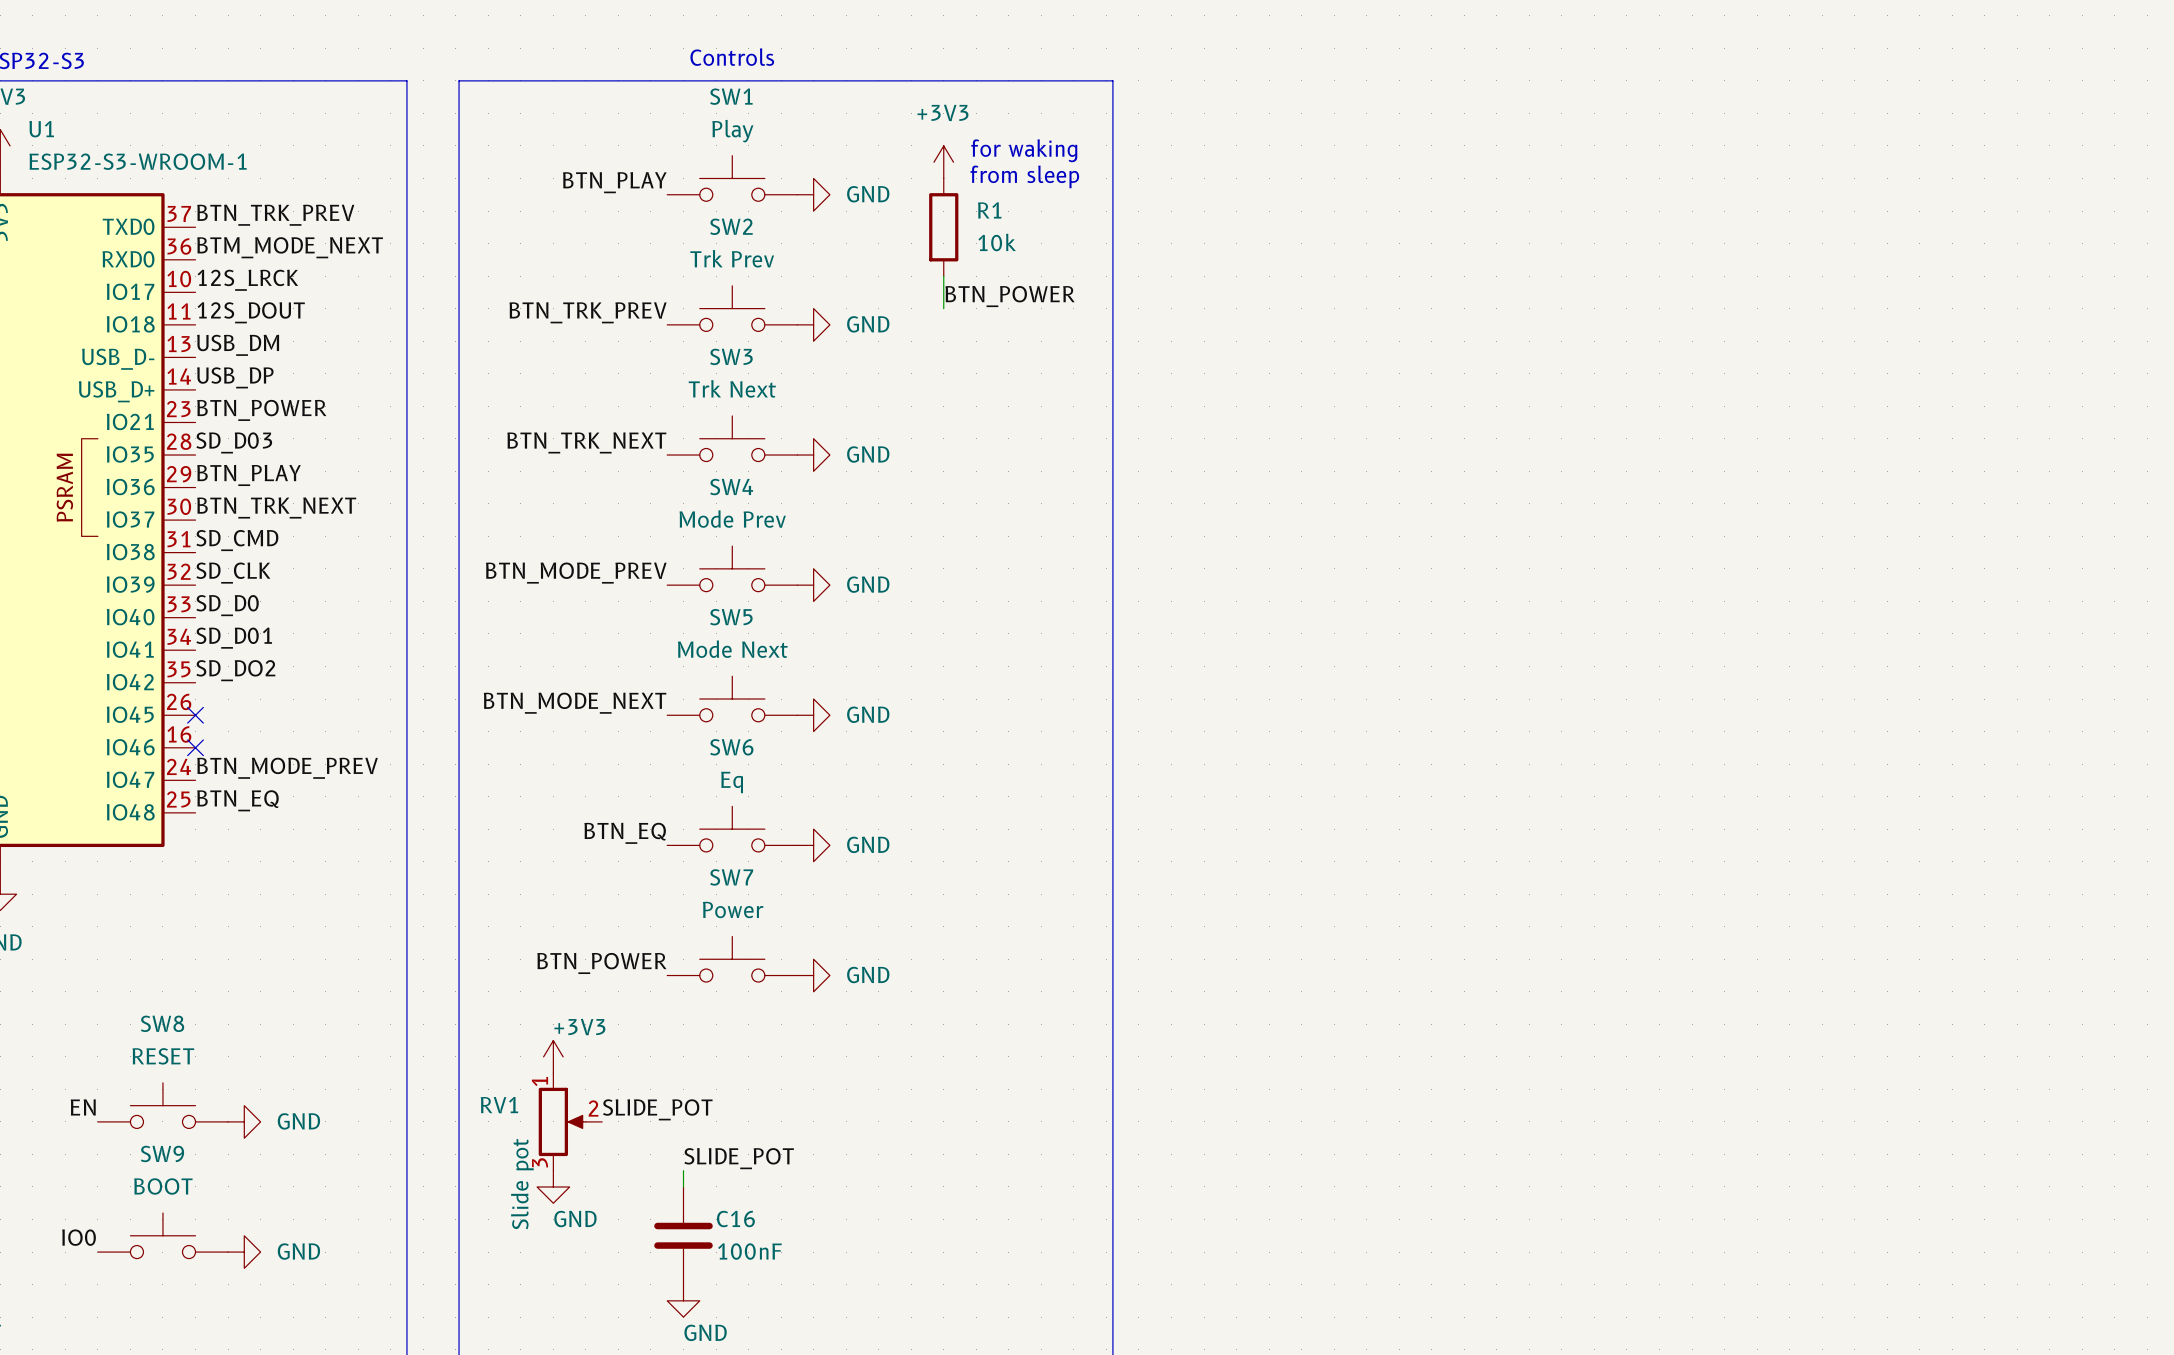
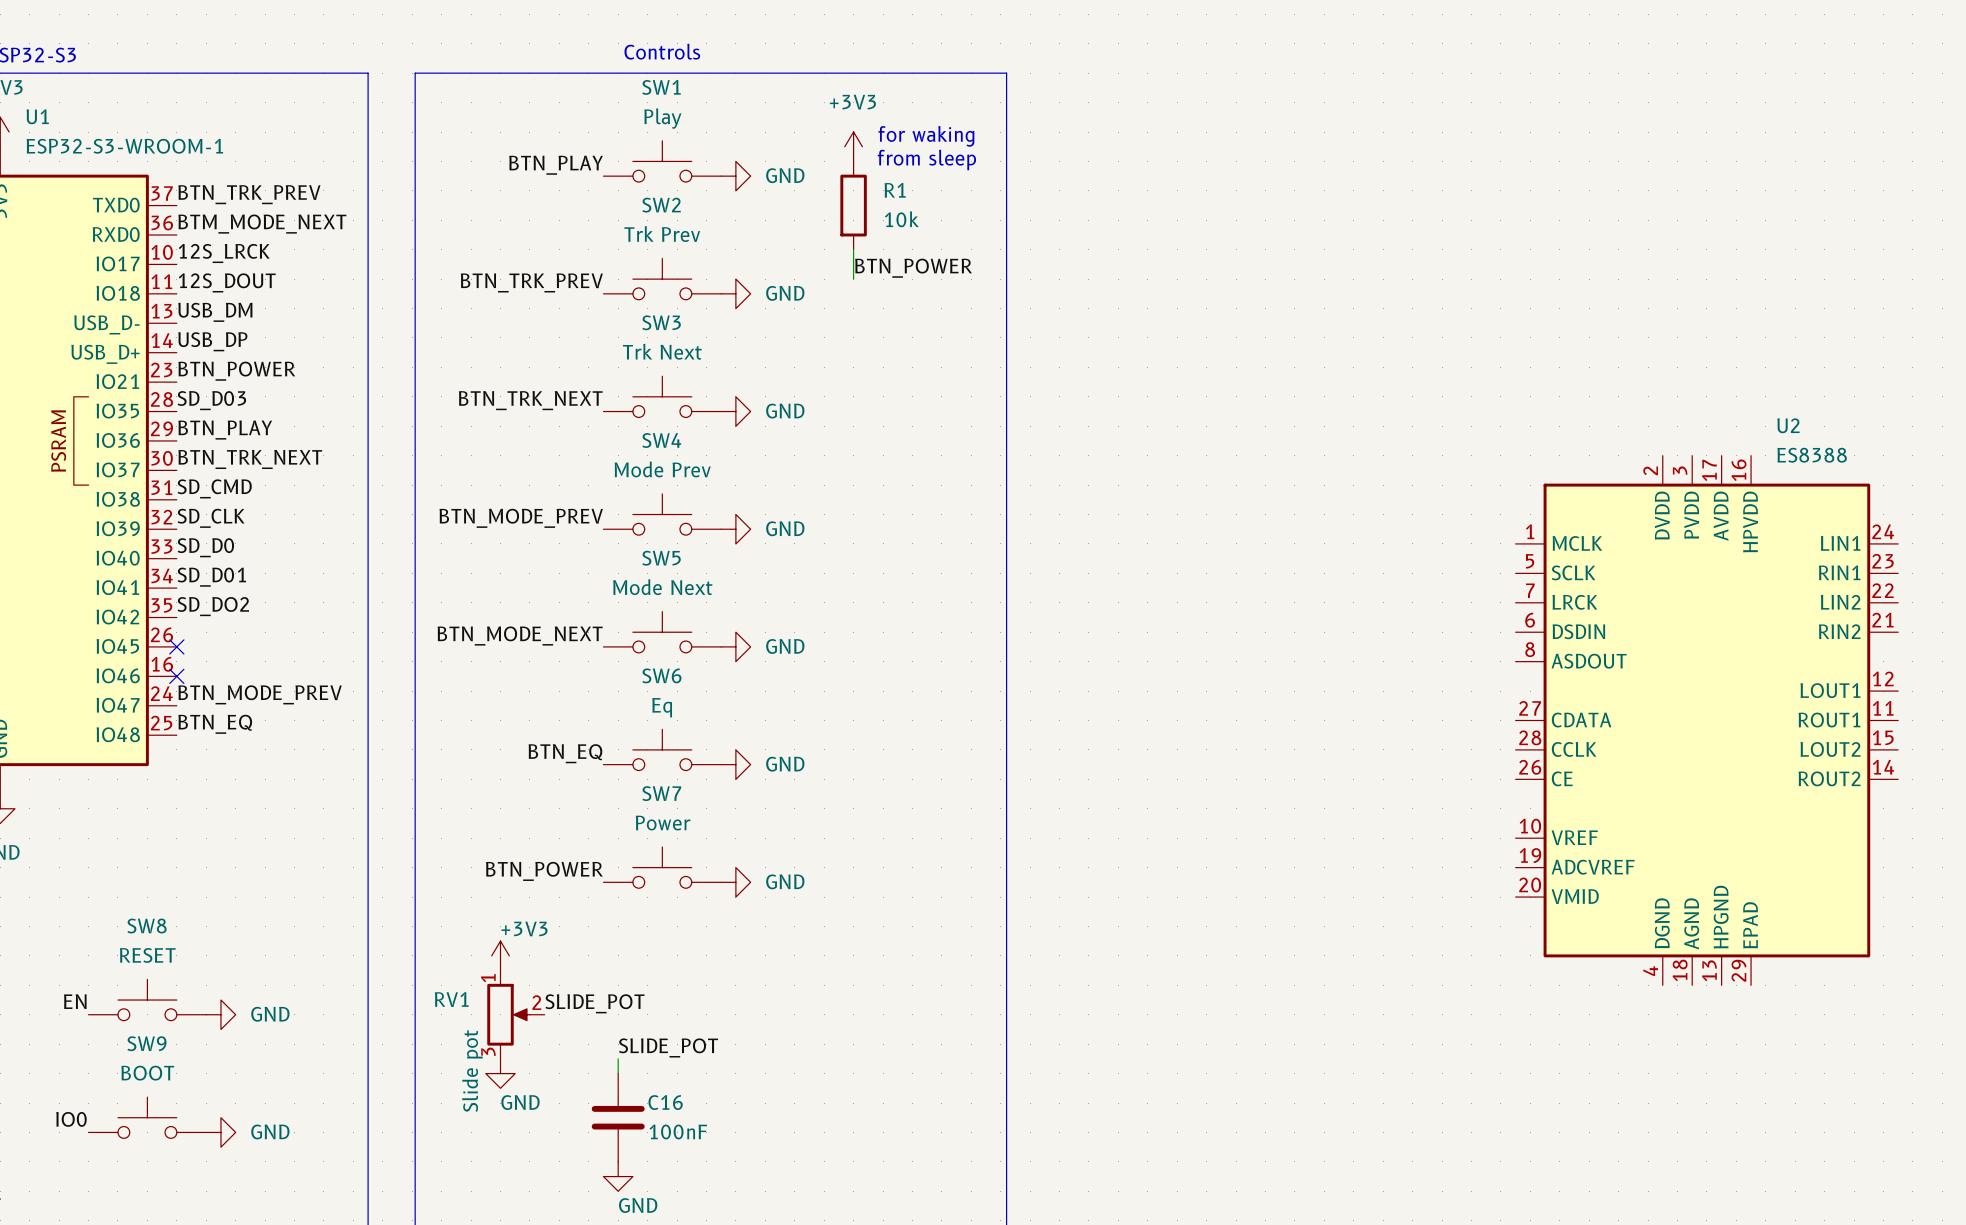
U2: none -> ES8388 (1706, 720)

